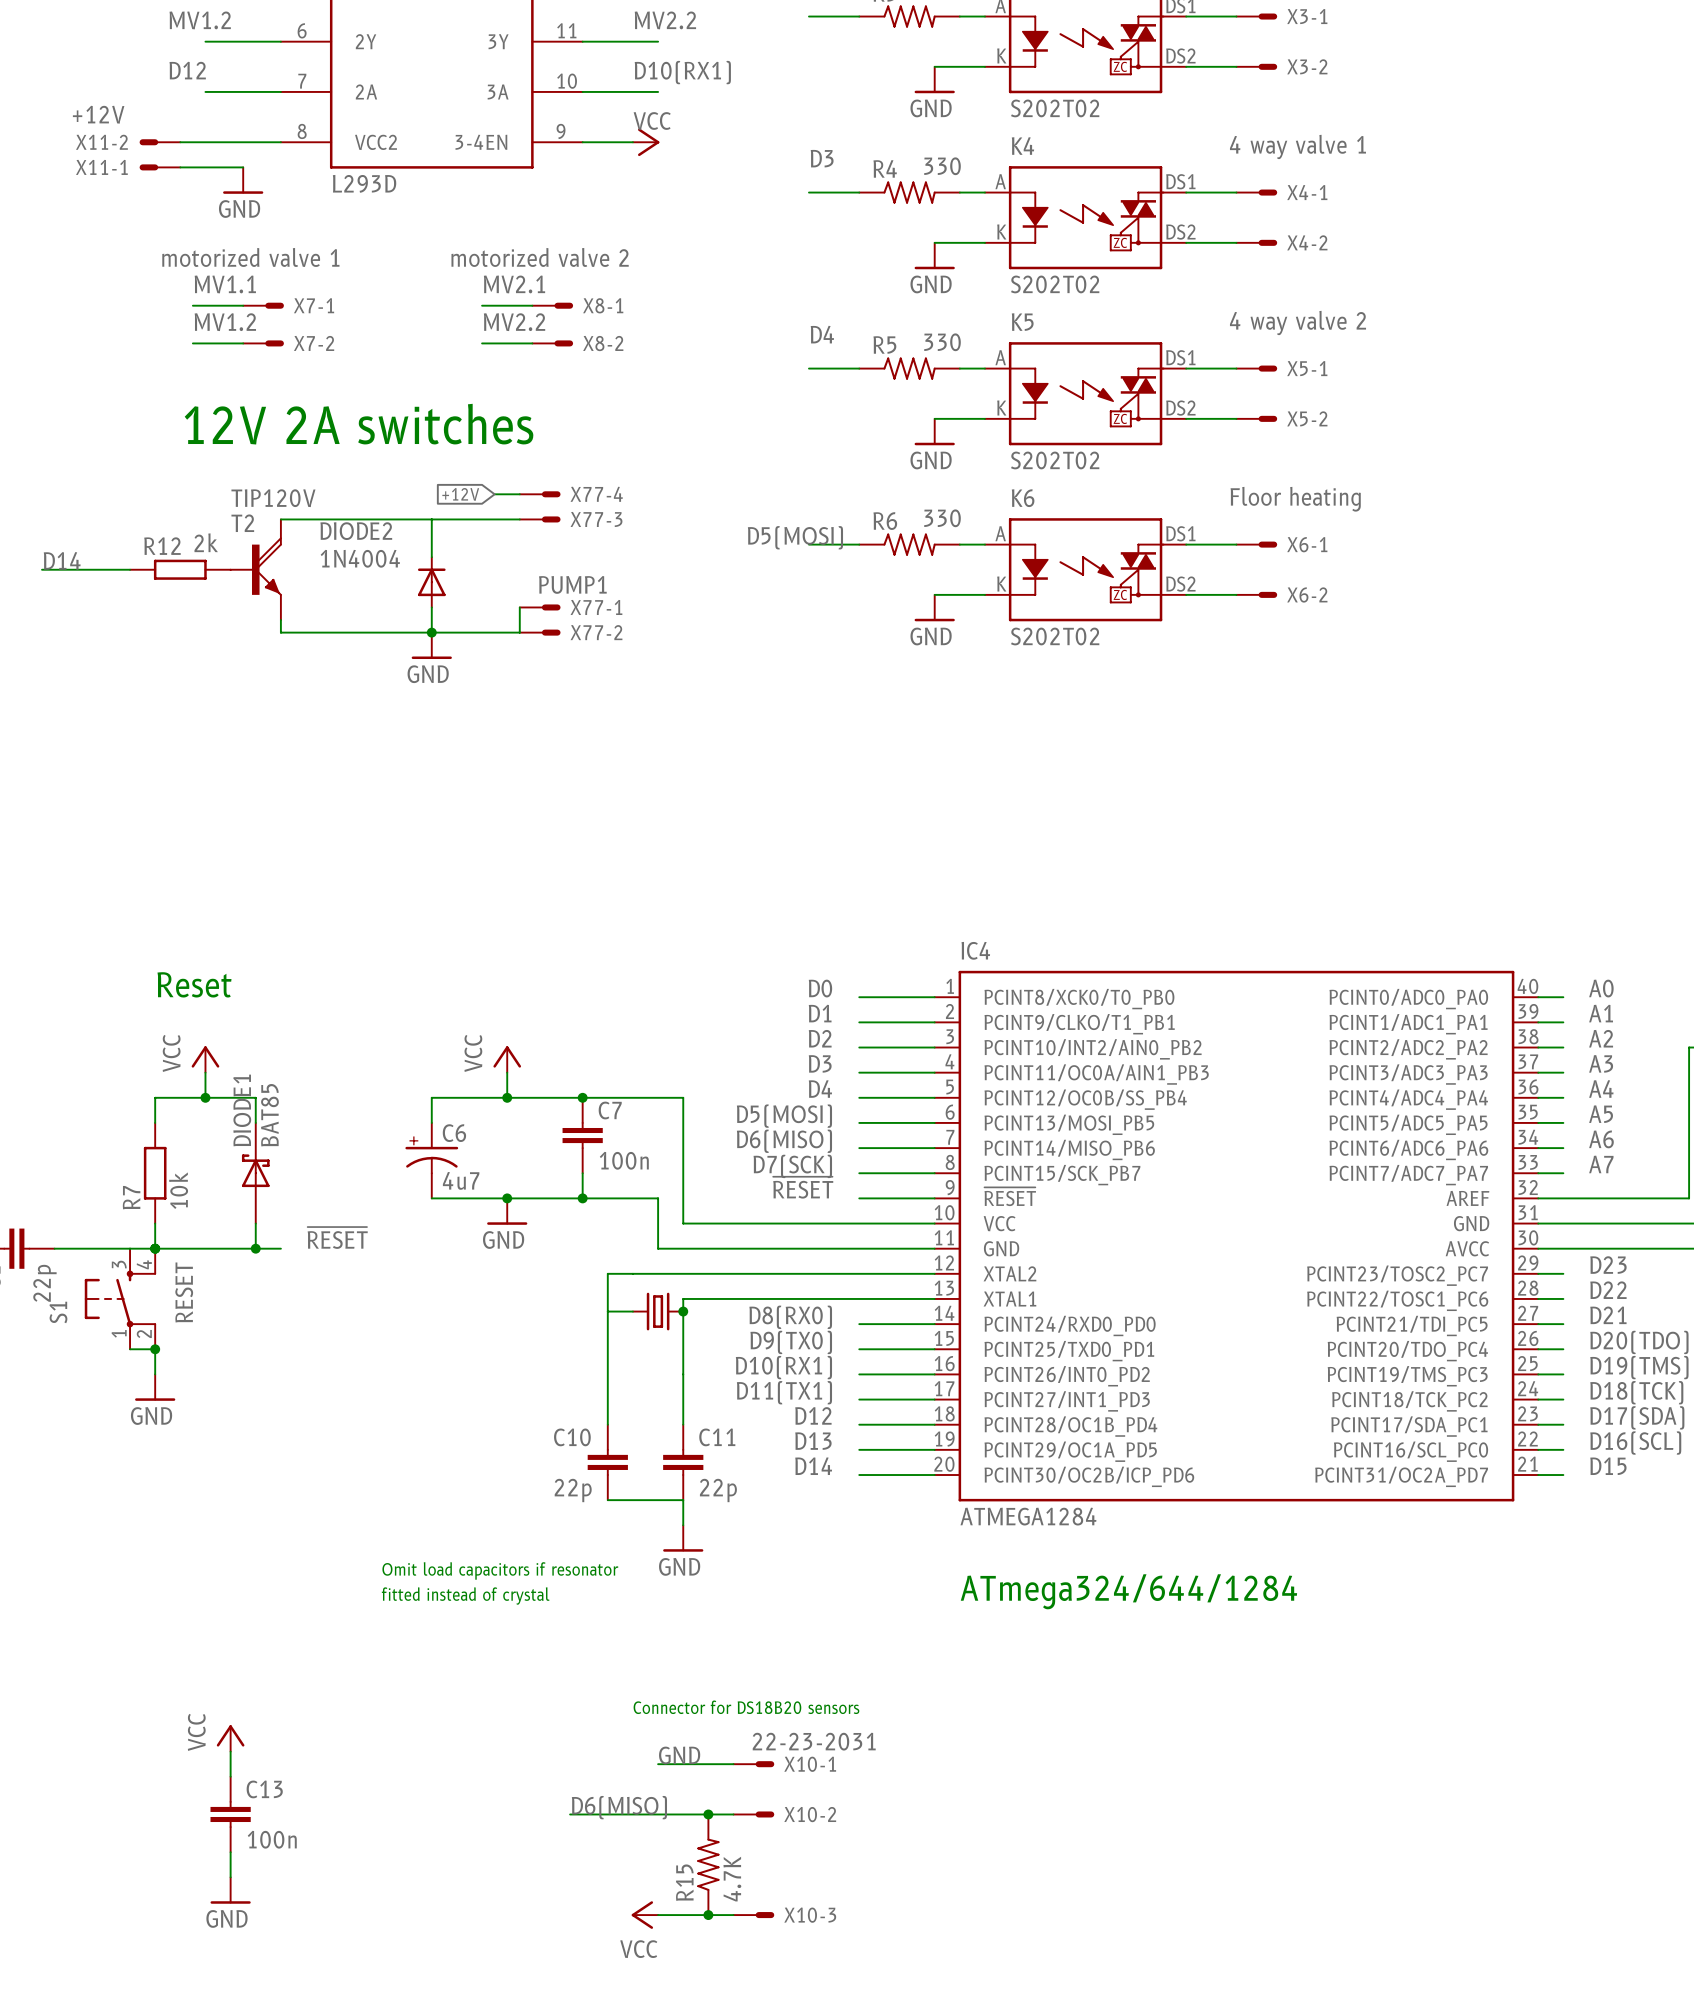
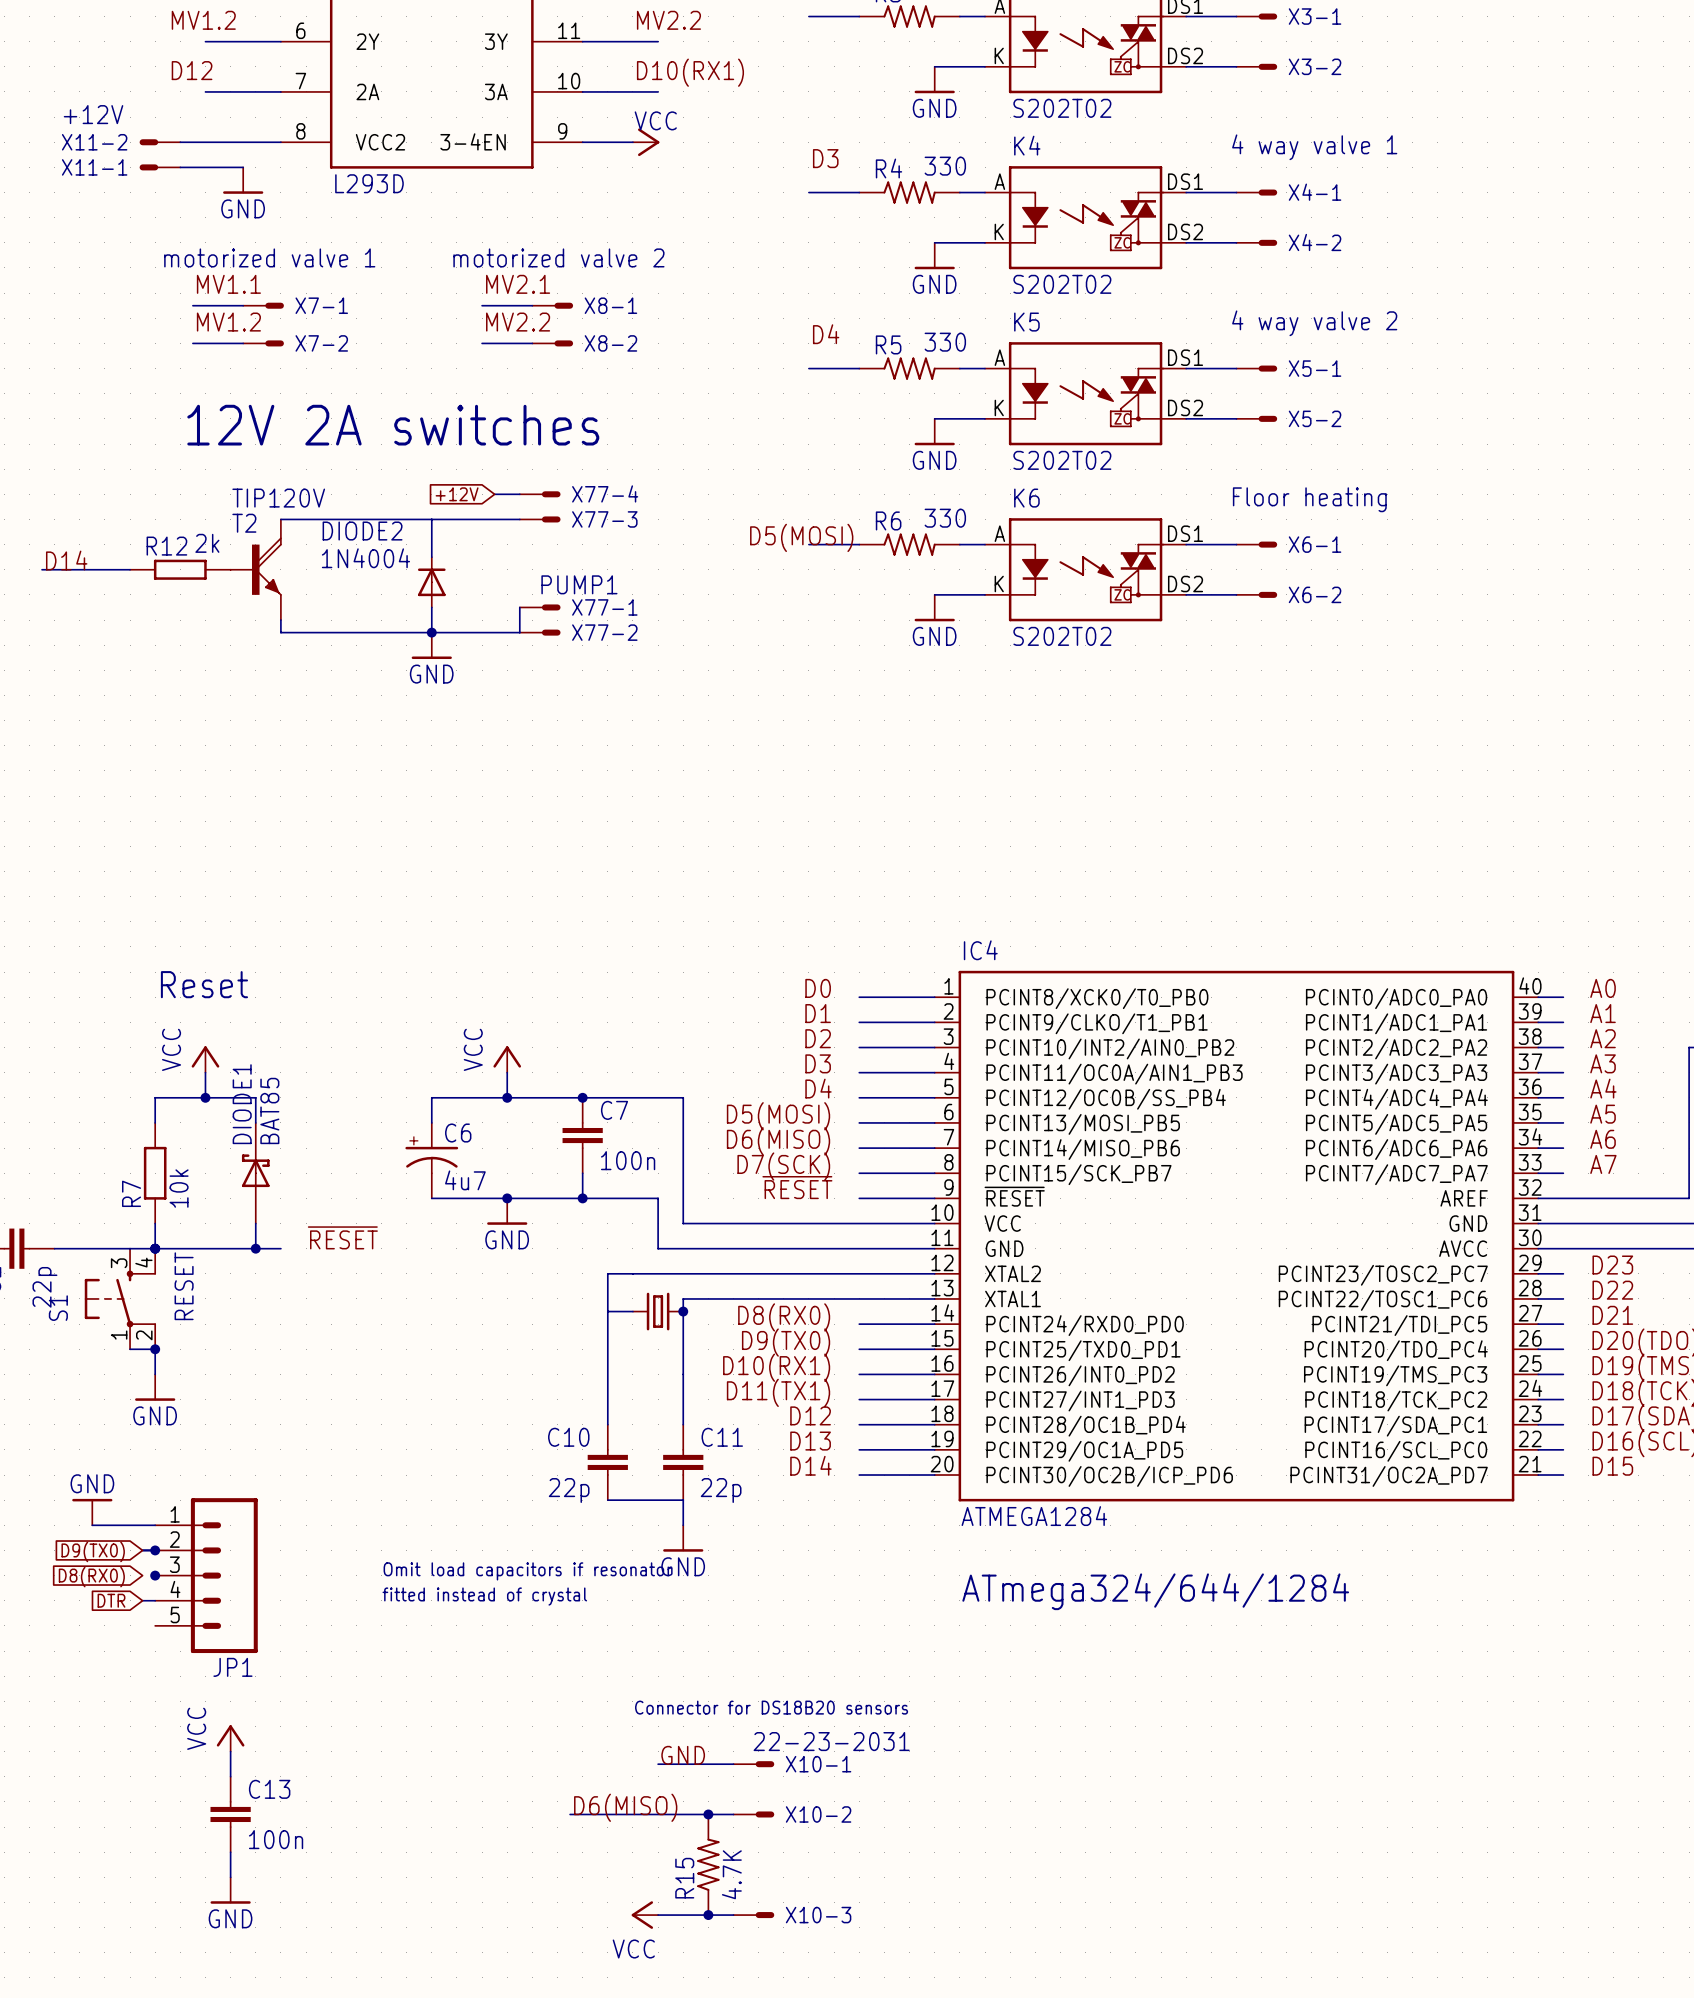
power symbol: none -> GND (92, 1512)
wire: none -> (92, 1525) (155, 1525)
junction: none -> (155, 1550)
global label: none -> D9(TX0) (93, 1551)
junction: none -> (155, 1575)
JP1: none -> (206, 1575)
global label: none -> D8(RX0) (91, 1577)
global label: none -> DTR (111, 1600)
wire: none -> (142, 1600) (155, 1600)

